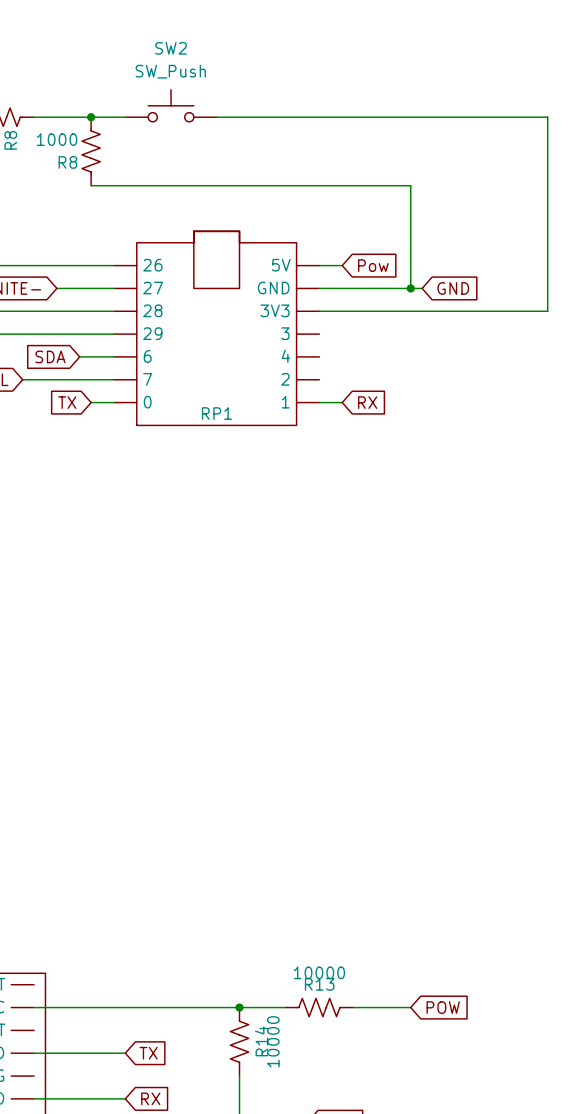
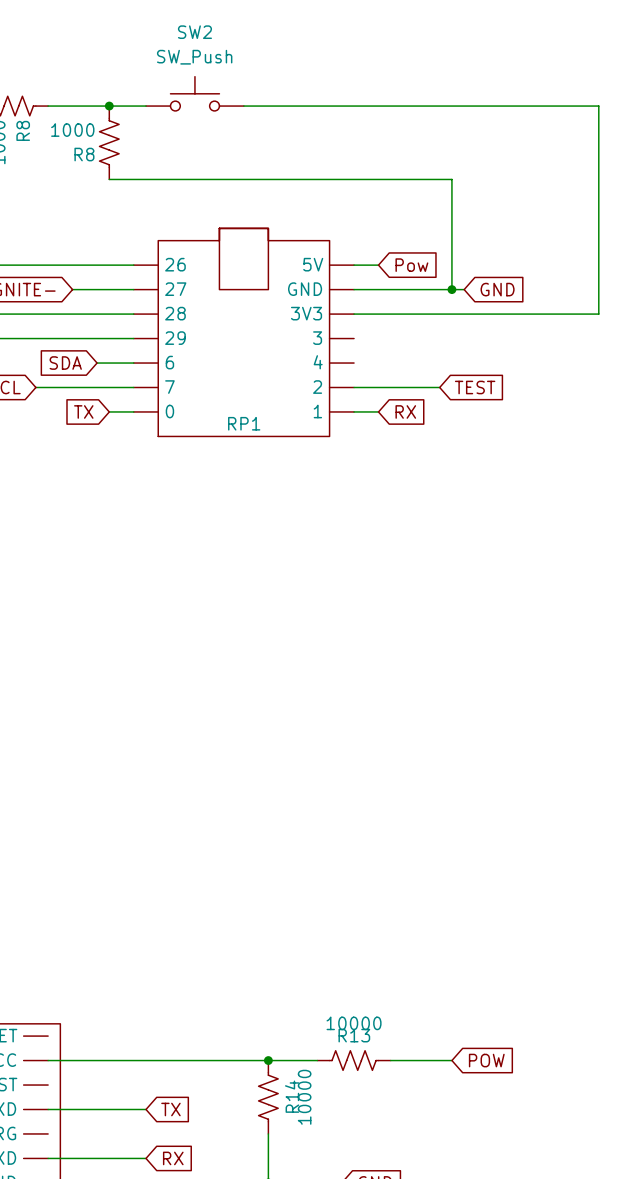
wire: none -> (354, 387) (439, 387)
global label: none -> TEST (475, 387)

